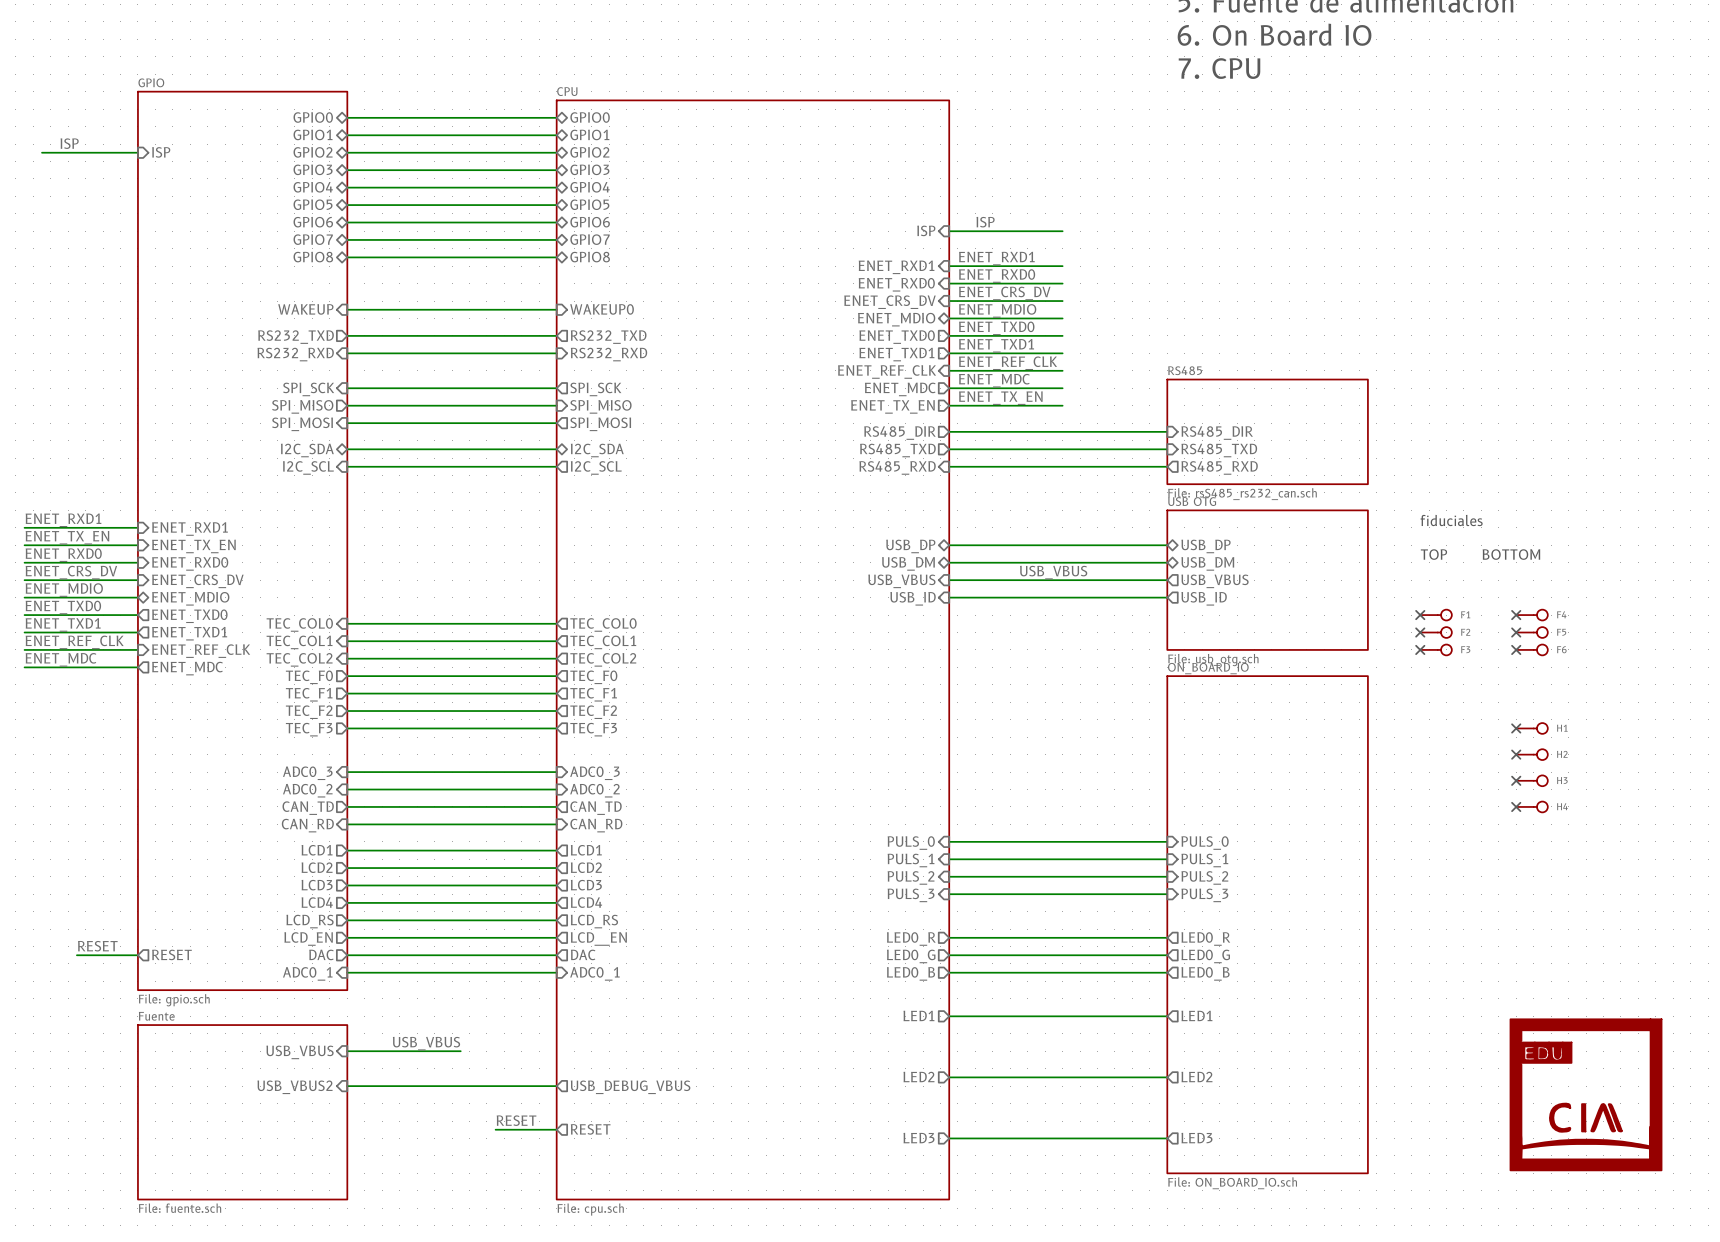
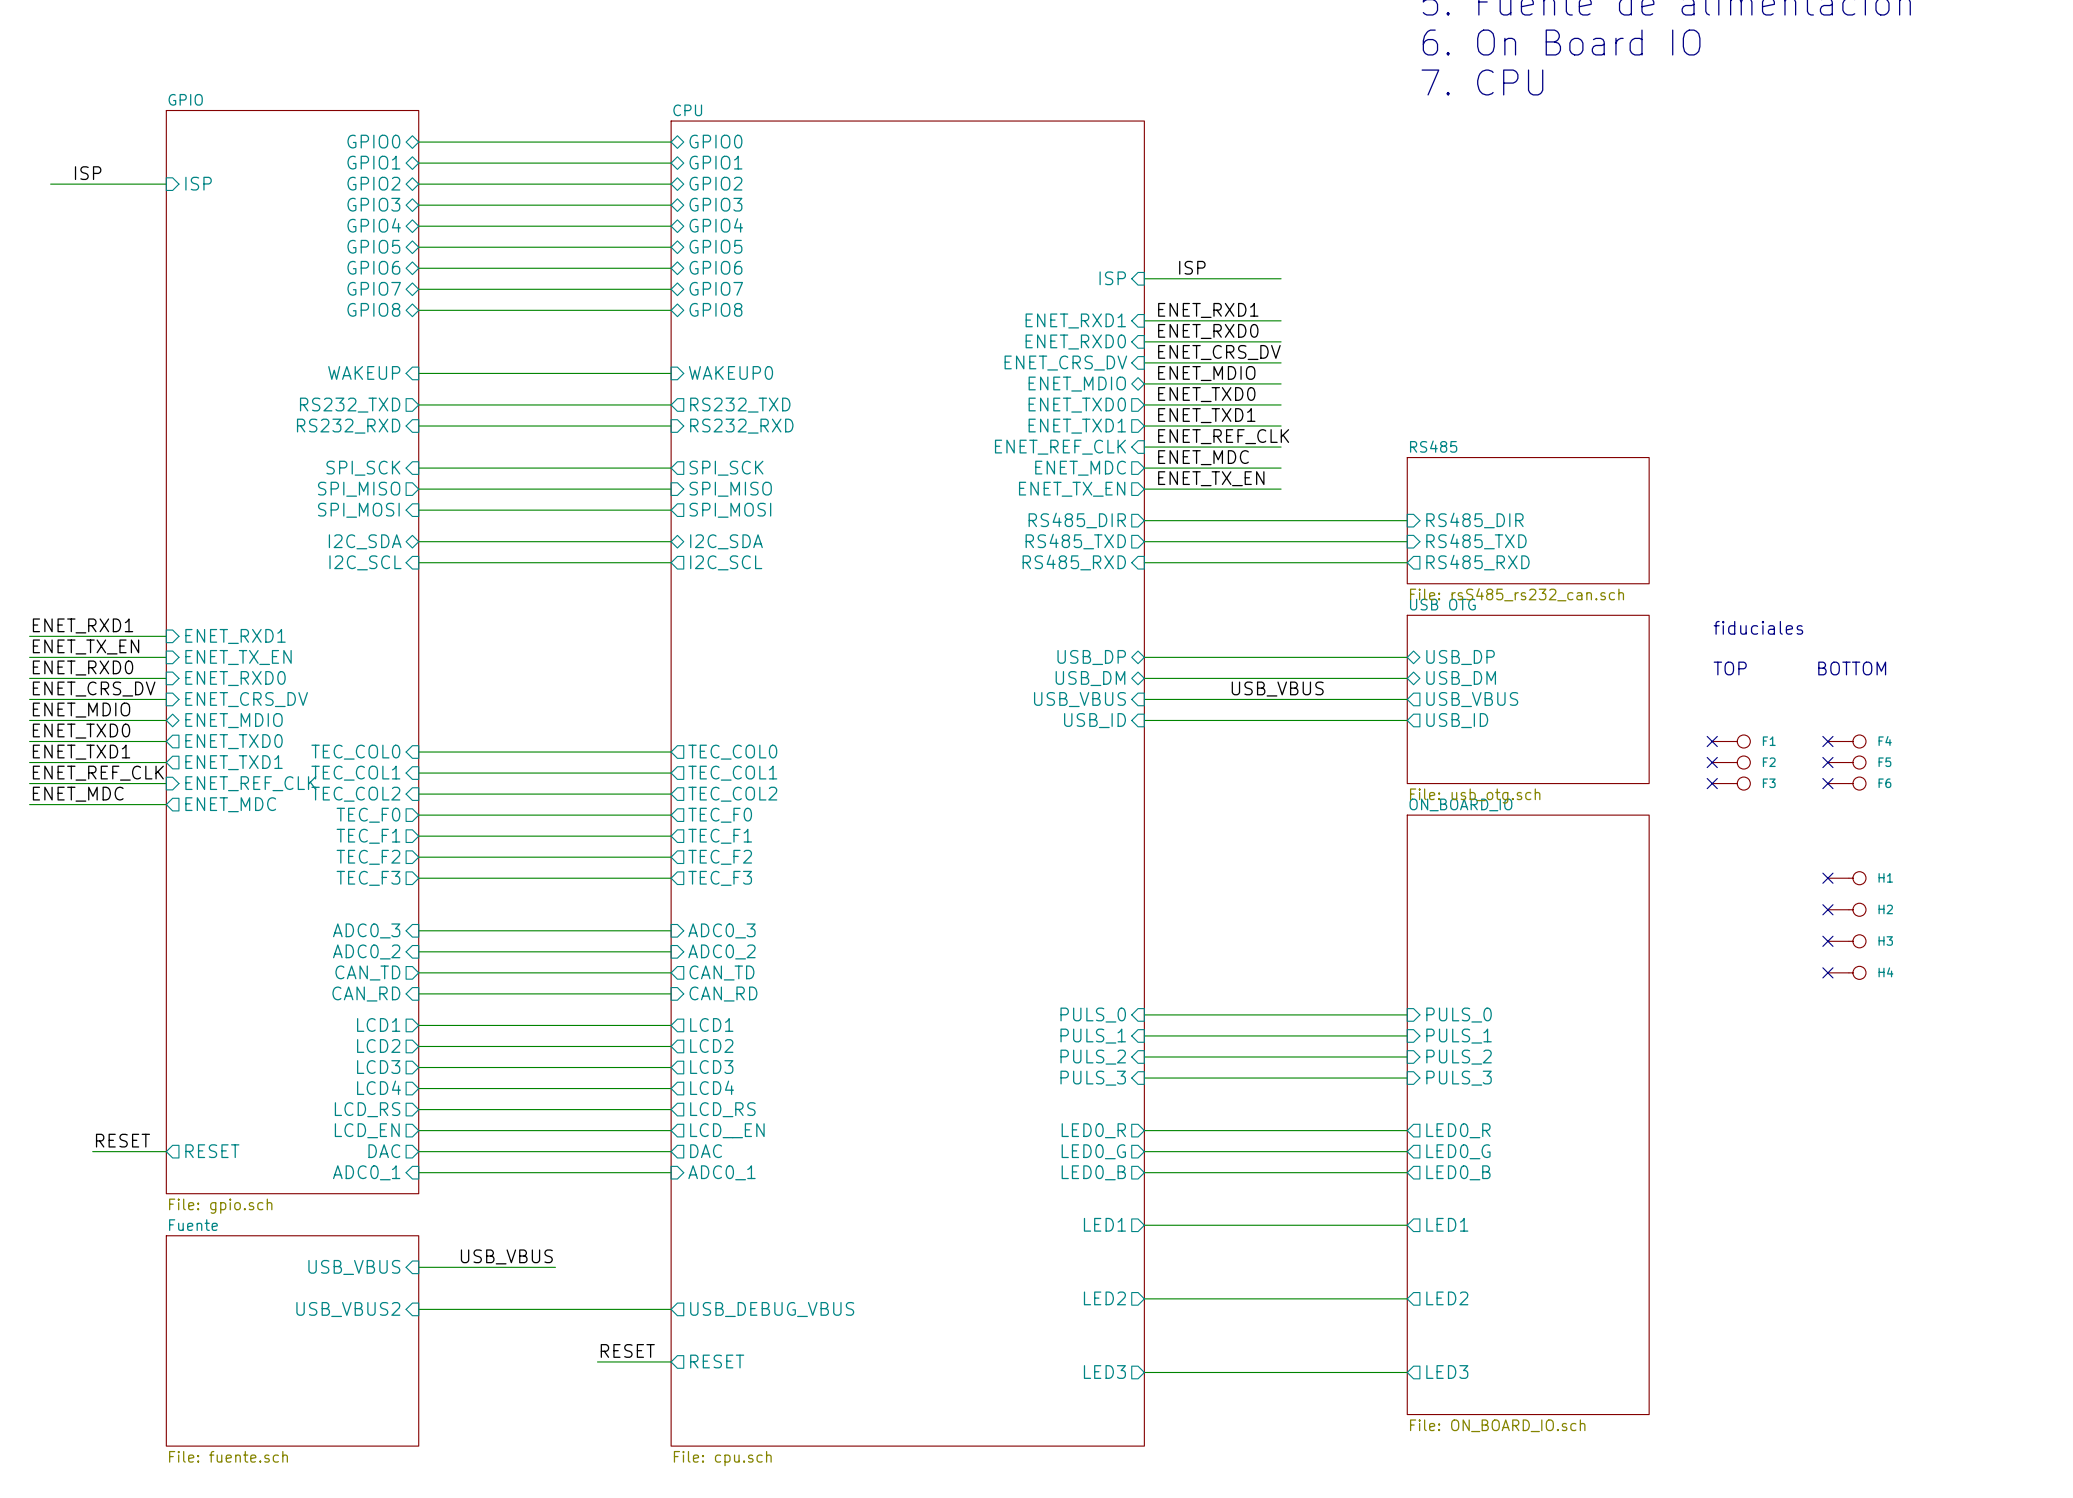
power symbol: (1586, 1094) -> none

